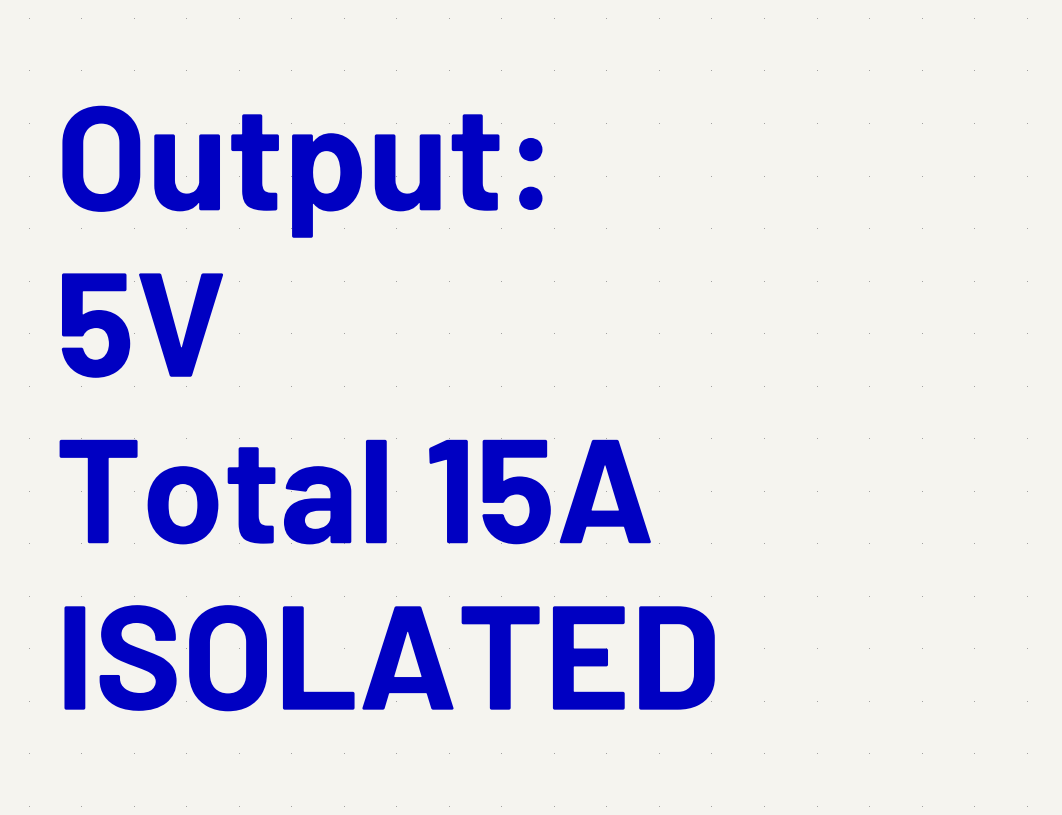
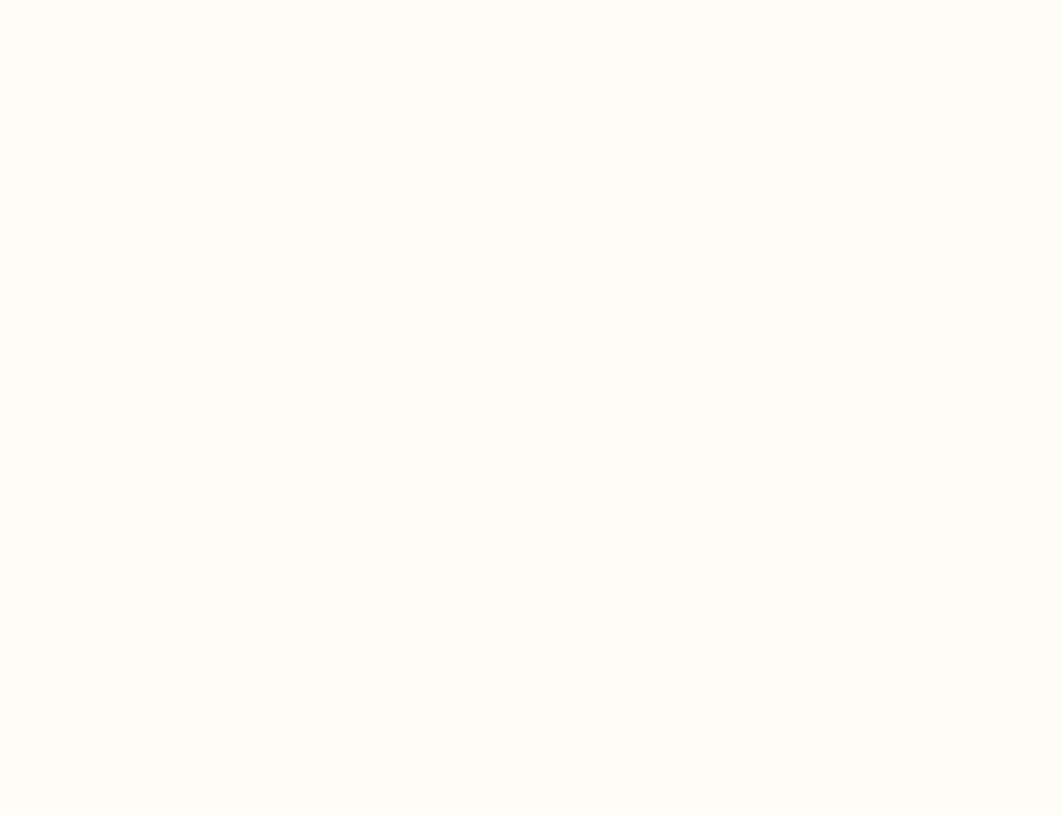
text: Output: (302, 171) -> none
text: 5V (142, 325) -> none
text: Total 15A (355, 492) -> none
text: ISOLATED (389, 658) -> none

